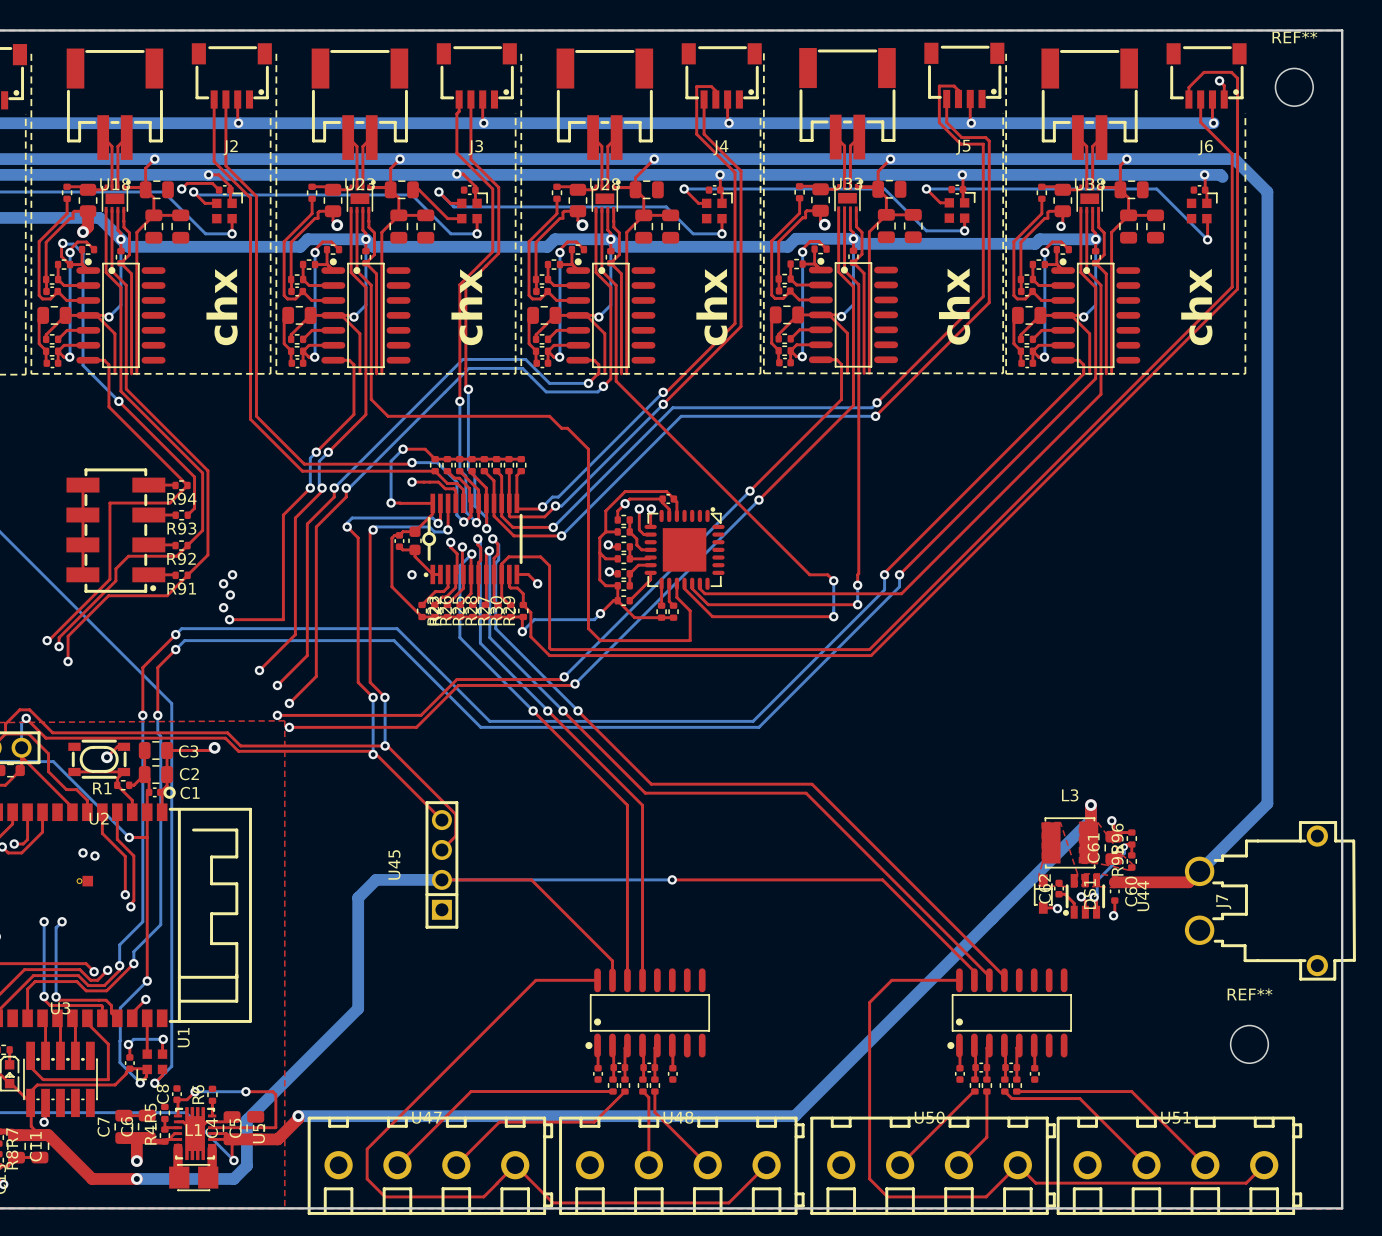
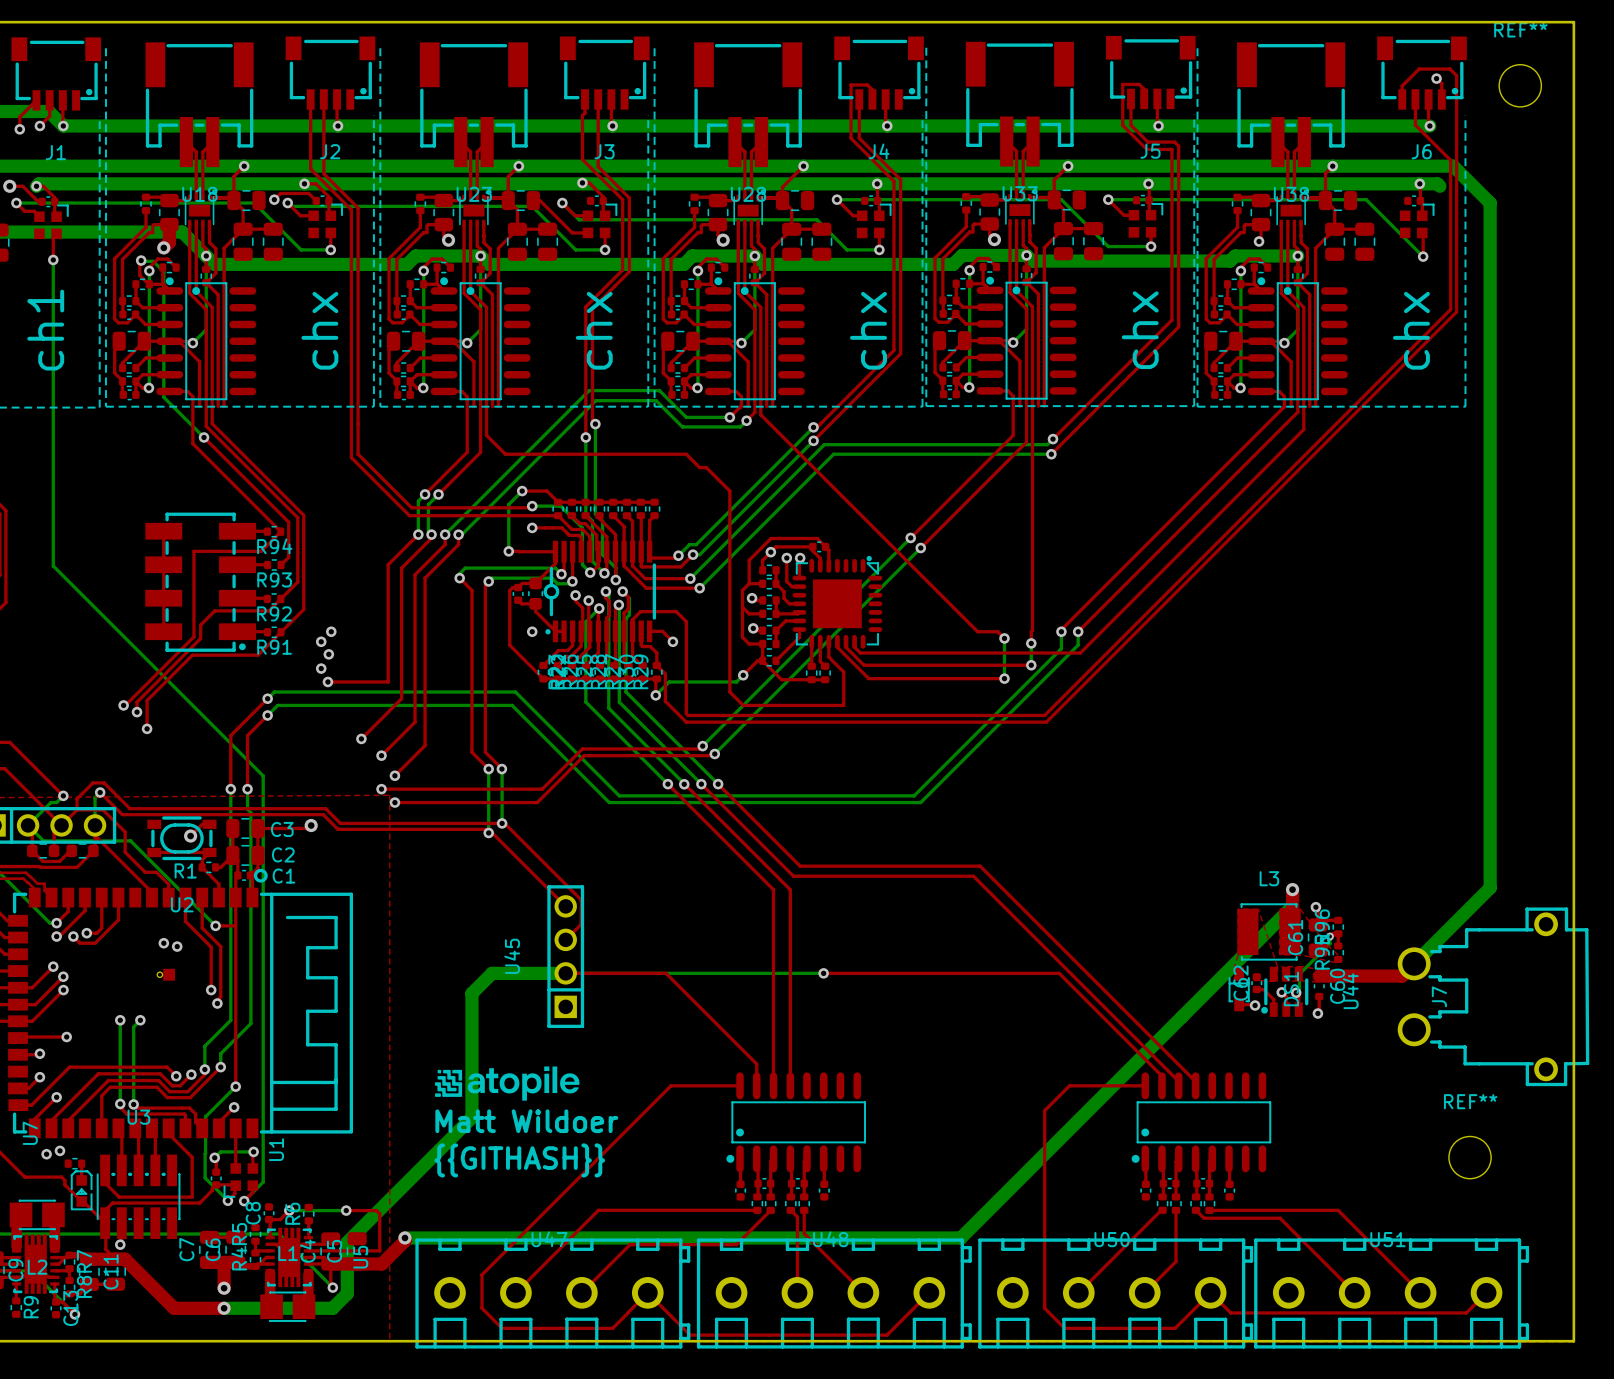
drawing: none -> [435, 1066, 580, 1101]
text: none -> Matt Wildoer (526, 1121)
text: none -> {{GITHASH}} (519, 1160)

